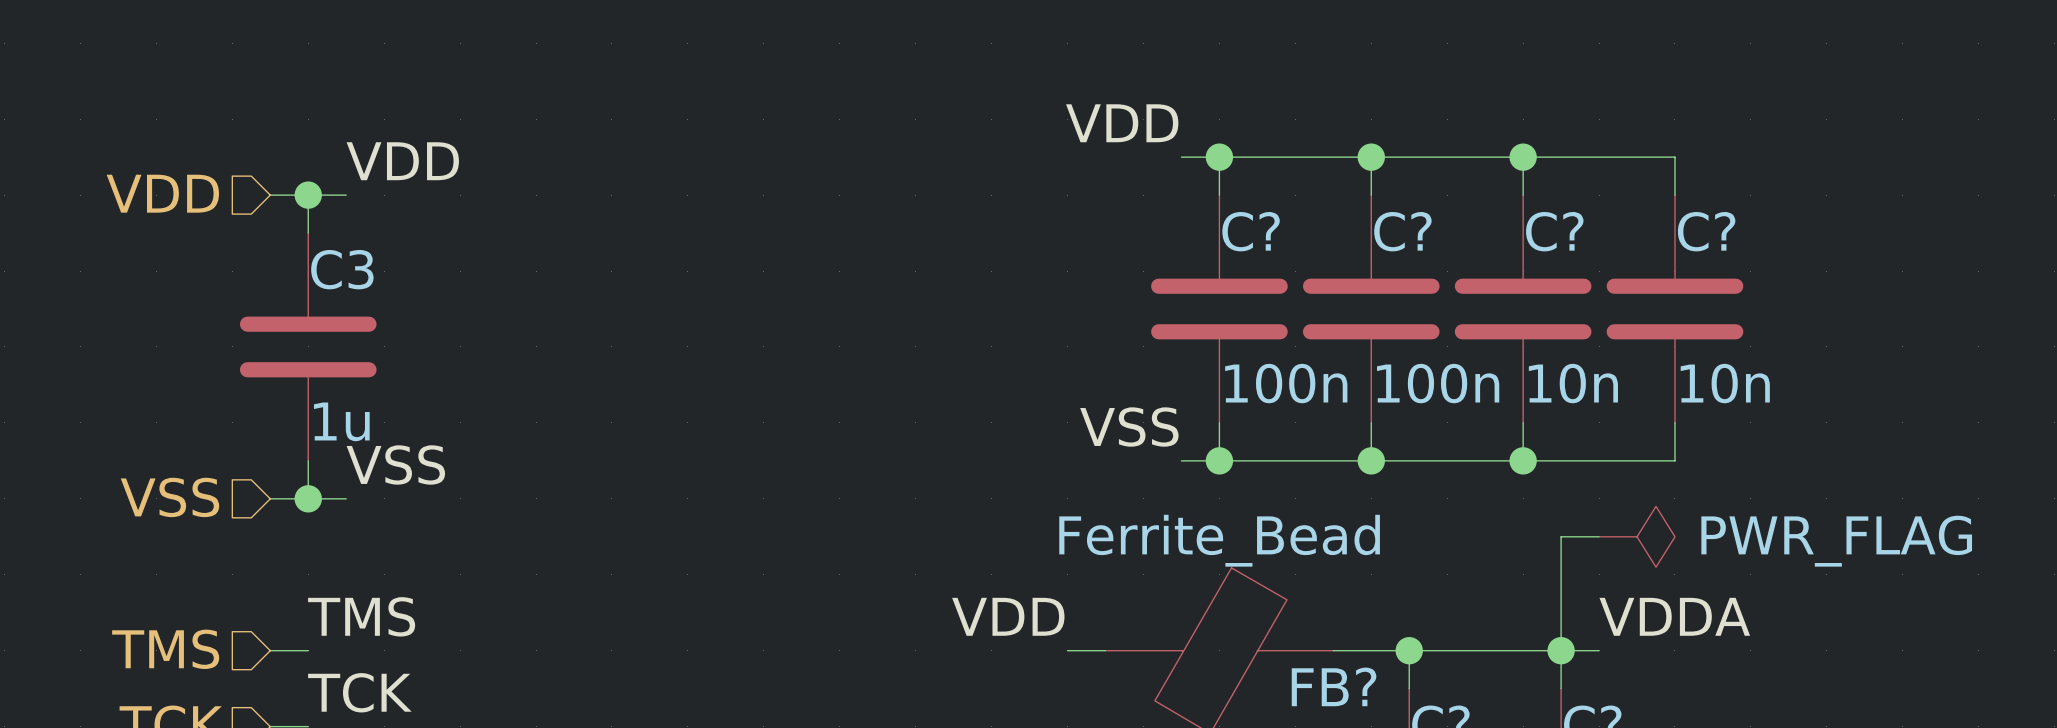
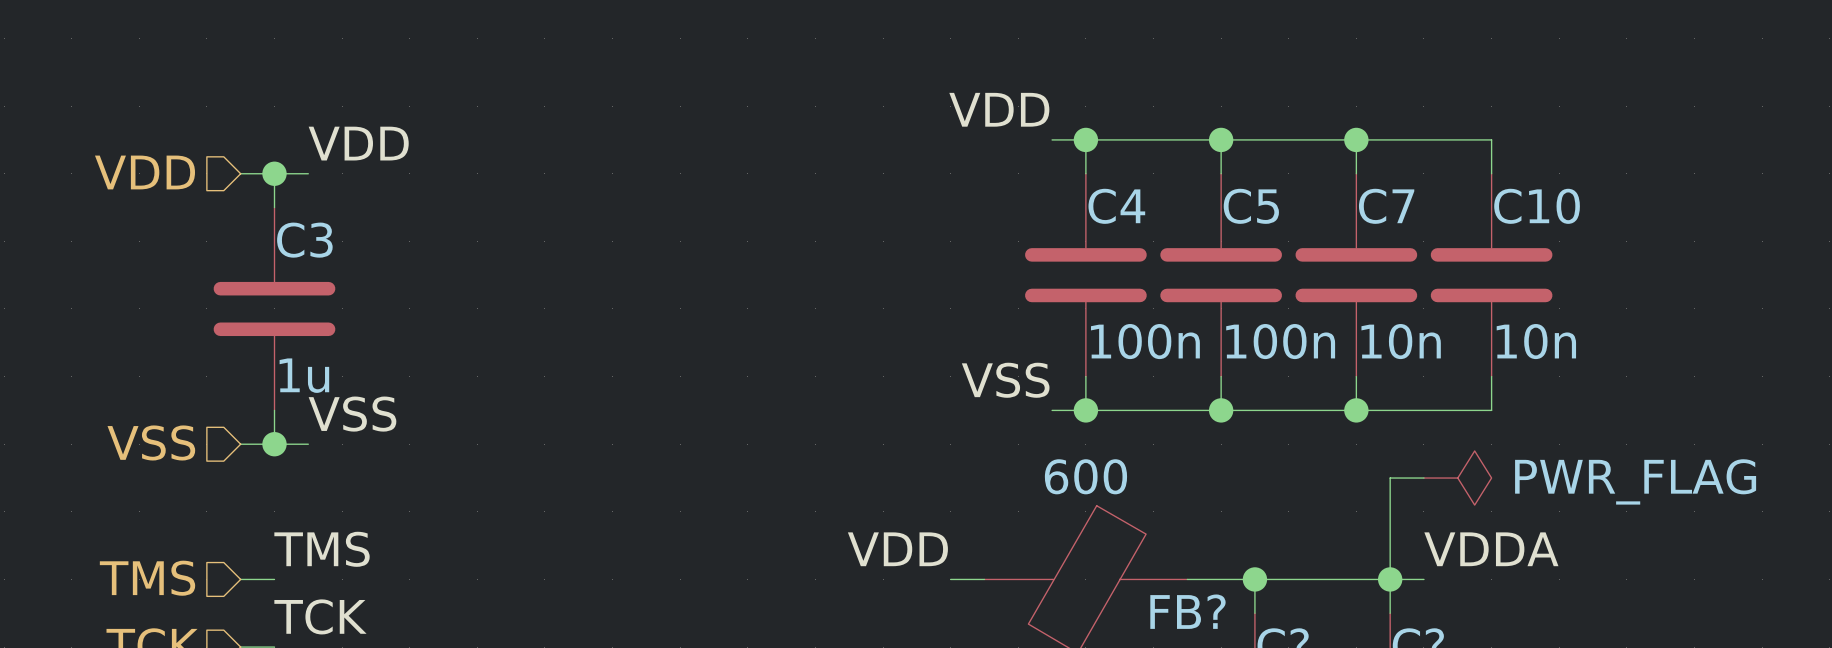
C? name: C? (1251, 231) -> C4 (1116, 206)
C? name: C? (1402, 231) -> C5 (1251, 206)
C? name: C? (1554, 231) -> C7 (1386, 206)
C? name: C? (1706, 231) -> C10 (1537, 206)
FB? value: Ferrite_Bead (1219, 540) -> 600 (1085, 476)

